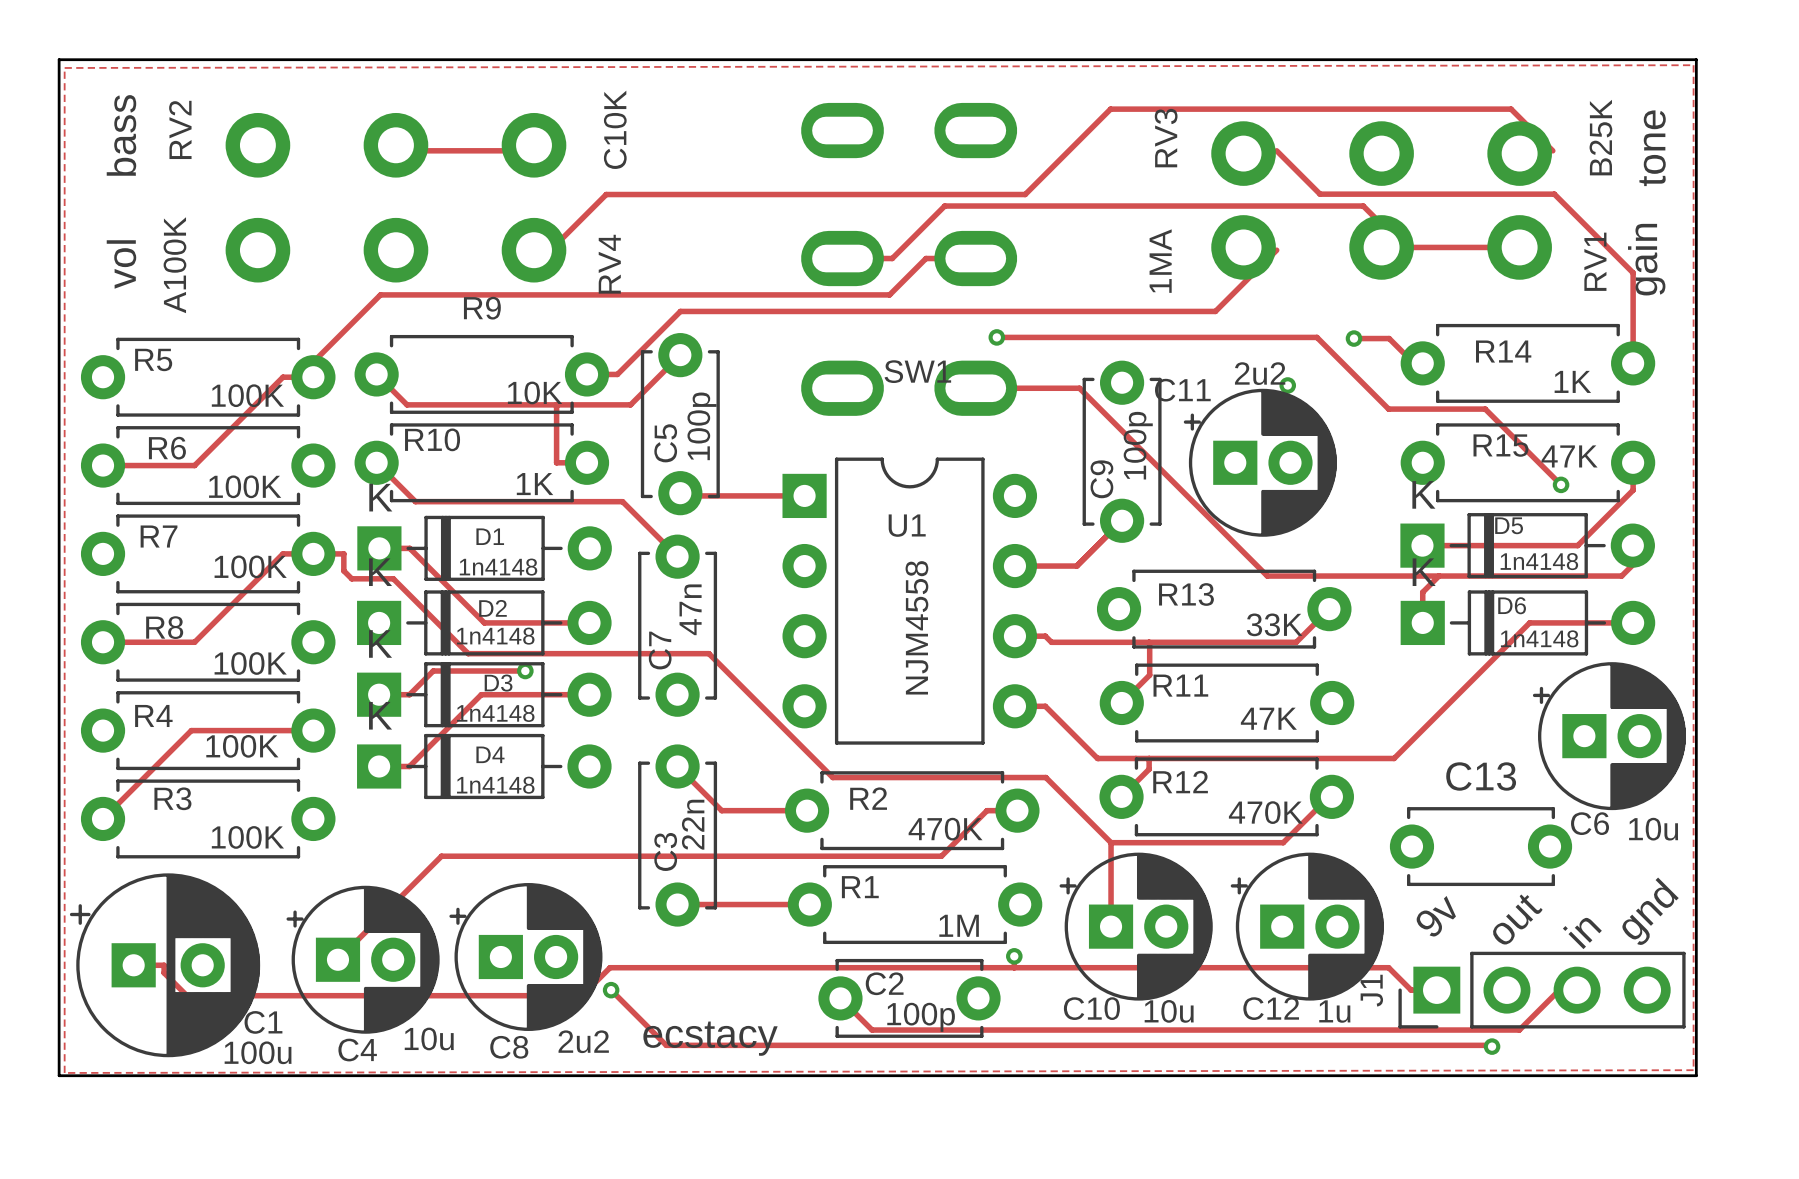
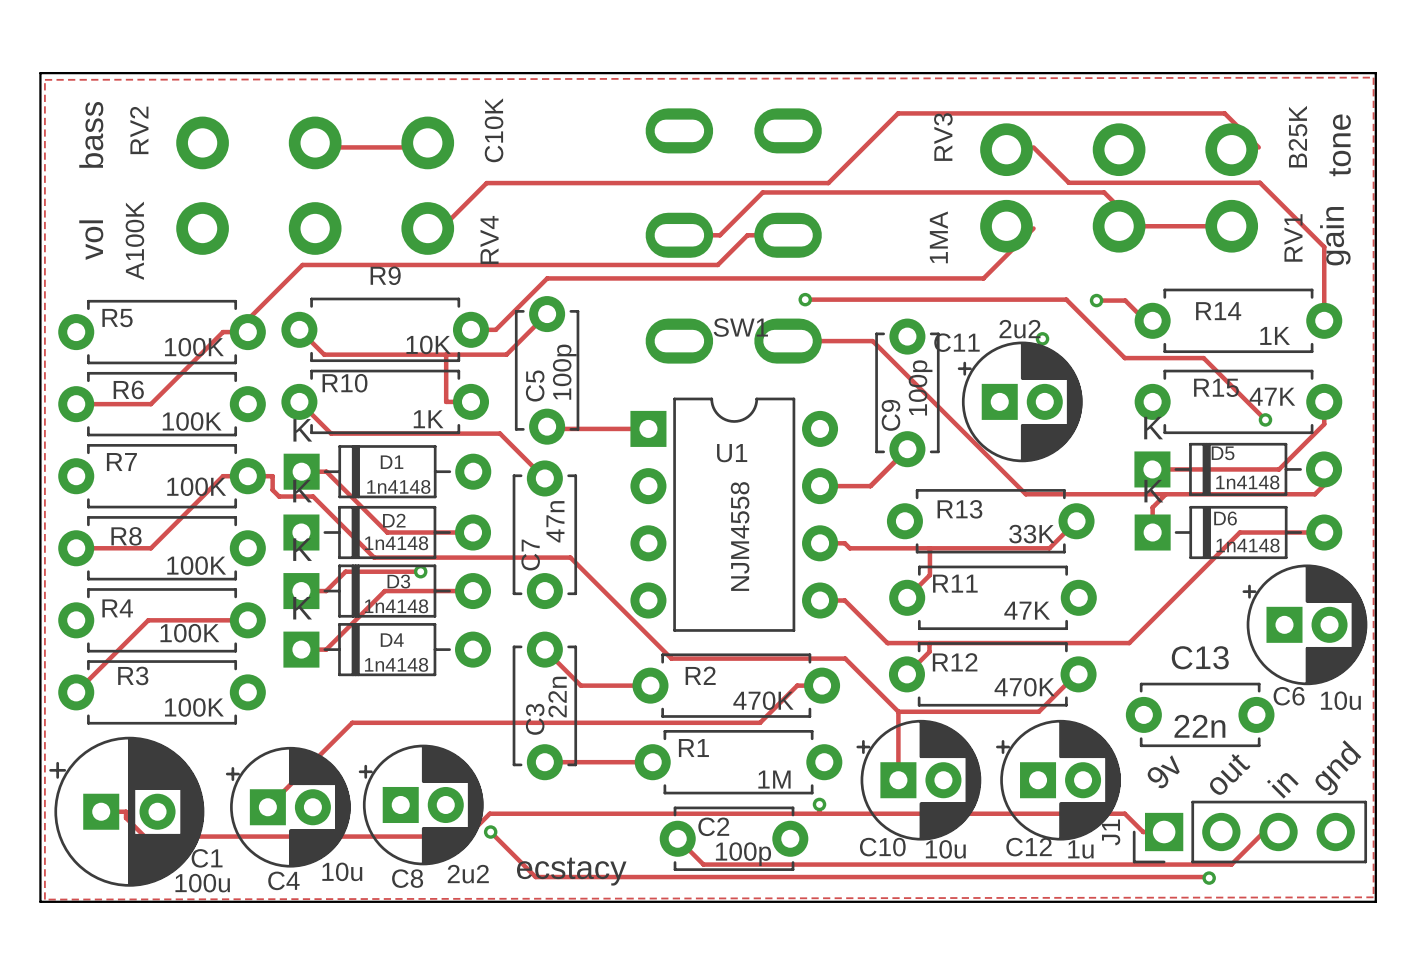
C13 value: none -> 22n (1199, 726)

